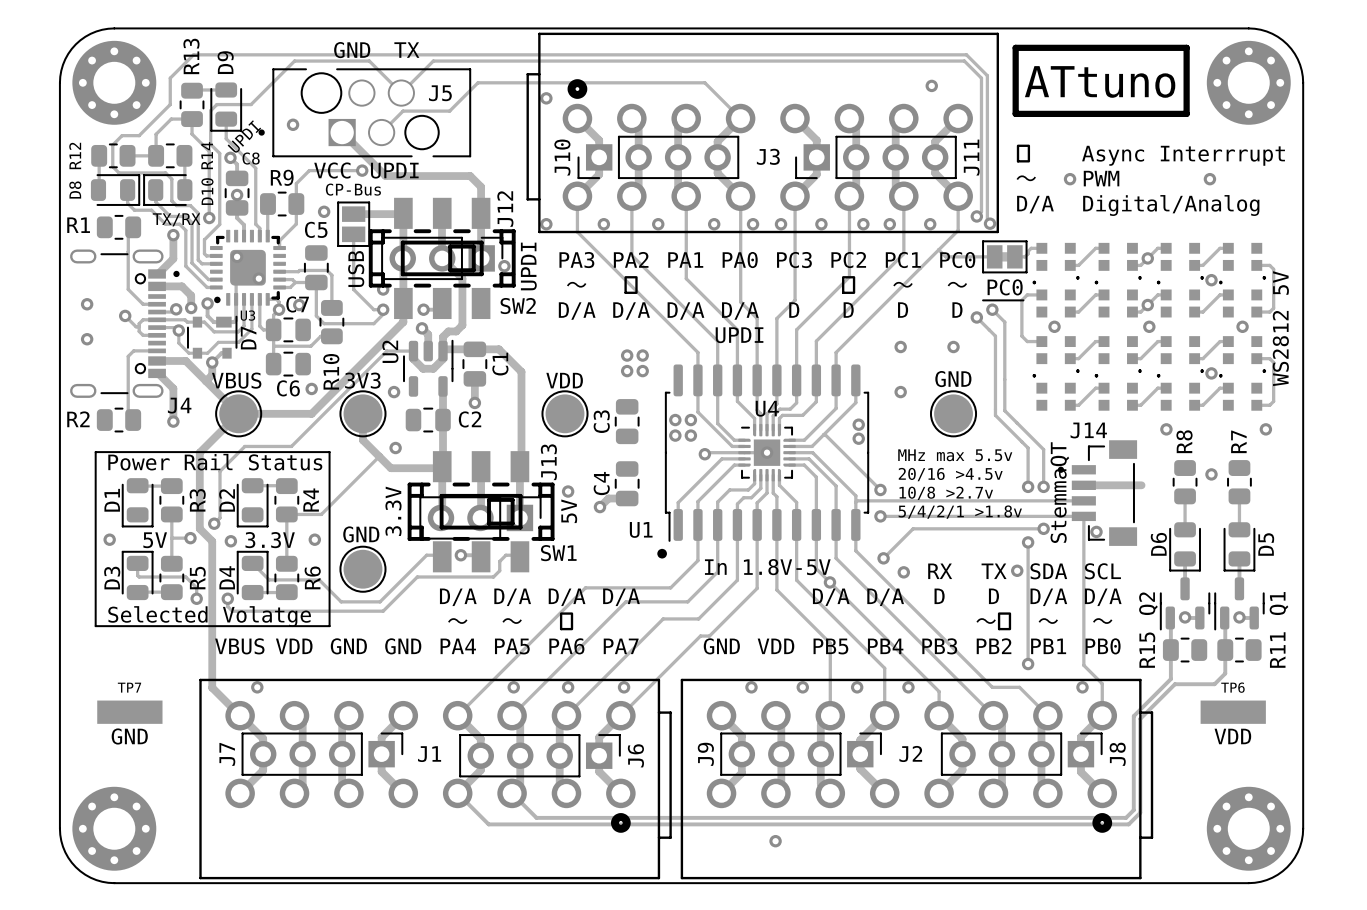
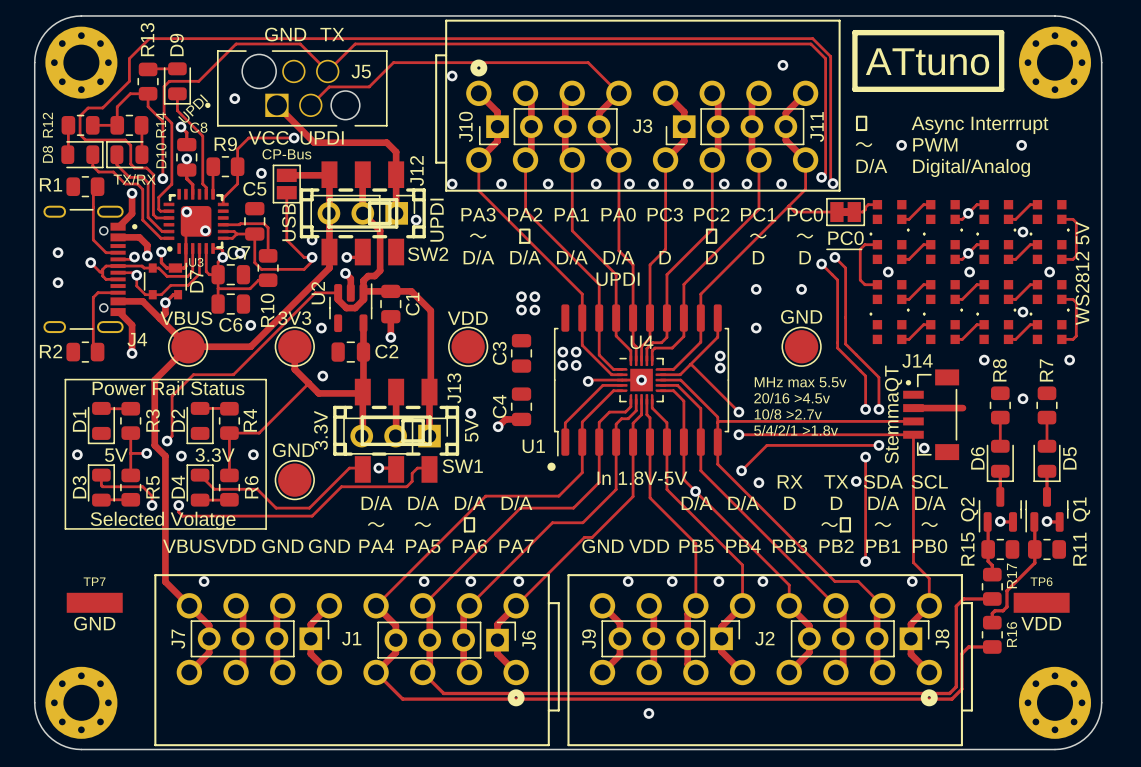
J14 footprint: [1057, 440, 1138, 546] -> [903, 369, 960, 461]
track: (1170, 663) (1170, 679) (1142, 707) -> (988, 561) (992, 565) (992, 574)
track: (1225, 665) (1225, 673) (1214, 684) (1174, 684) (1140, 718) (1140, 771) -> (1034, 562) (1006, 590) (1006, 606) (1002, 610) (994, 610) (992, 613) (992, 622)
R17: none -> (992, 586)
track: none -> (963, 598) (992, 598)
R16: none -> (992, 634)
track: none -> (992, 646) (968, 646) (961, 653)

